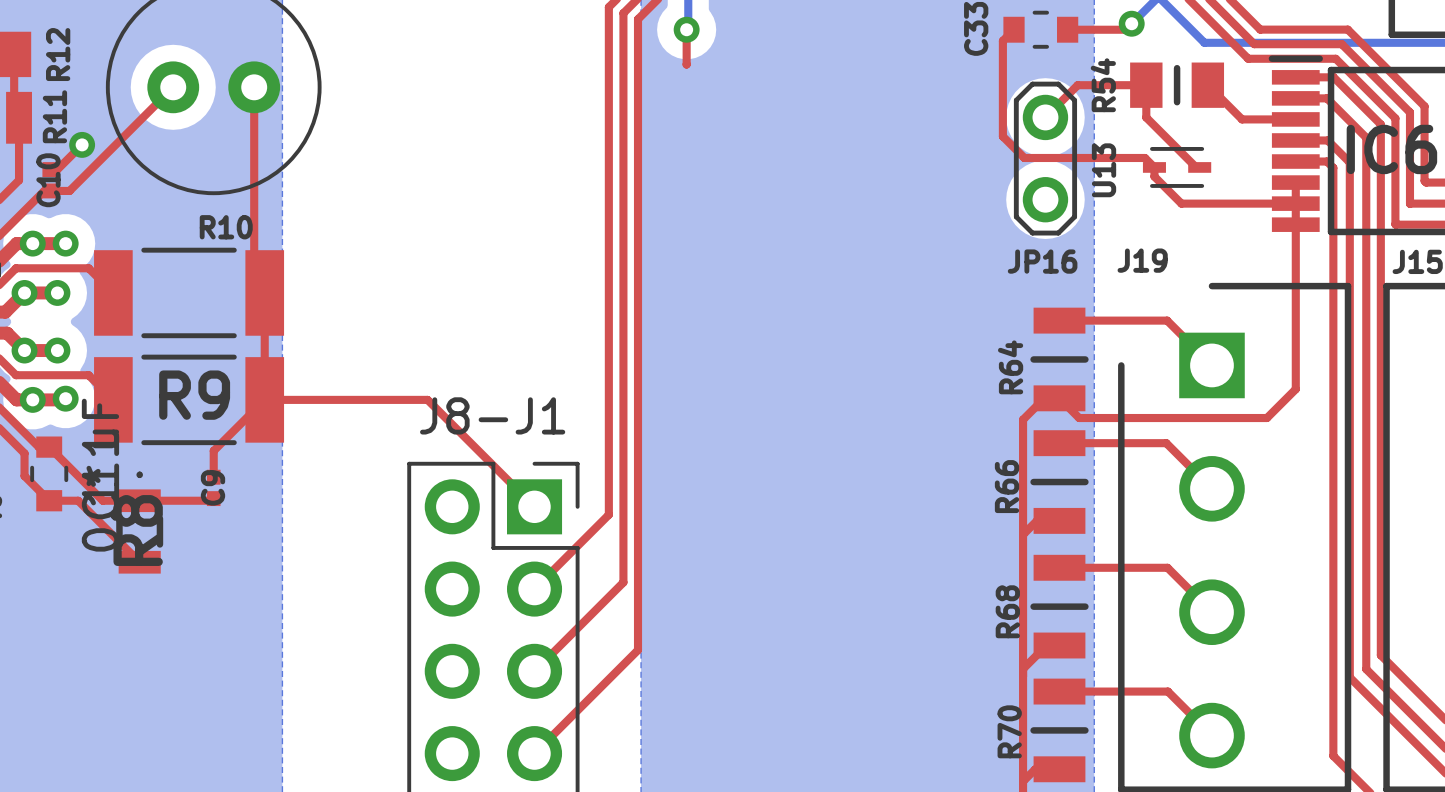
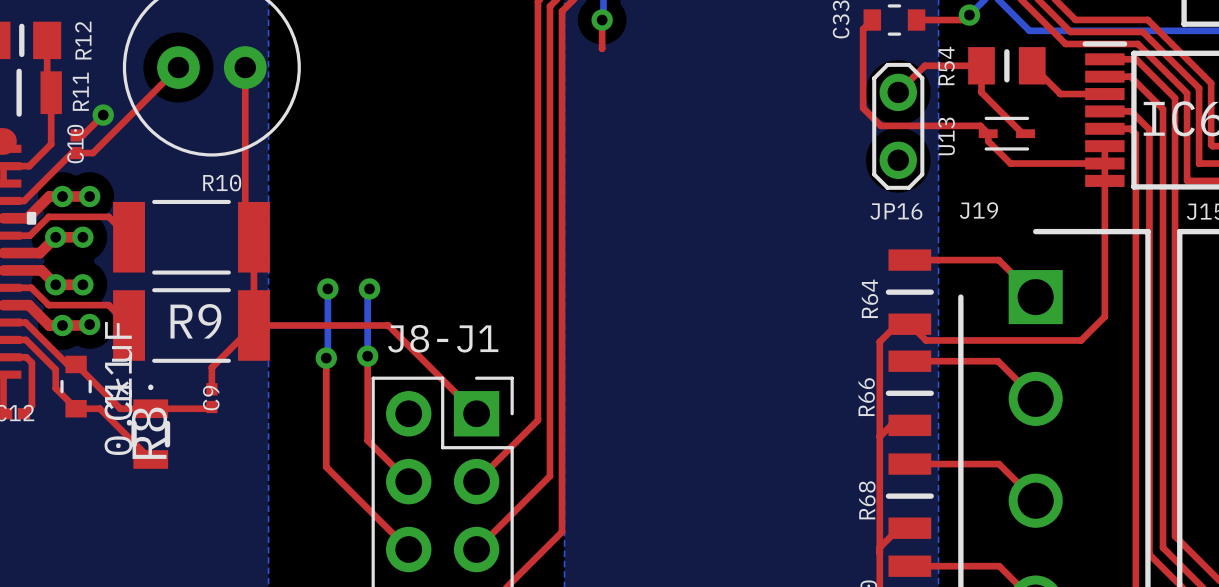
bottom track: none -> (327, 288) (327, 359)
via: none -> (327, 288)
bottom track: none -> (369, 288) (367, 290) (367, 356)
via: none -> (369, 288)
top track: none -> (367, 356) (367, 440) (408, 481)
via: none -> (367, 356)
top track: none -> (326, 358) (326, 467) (408, 549)
via: none -> (326, 358)

